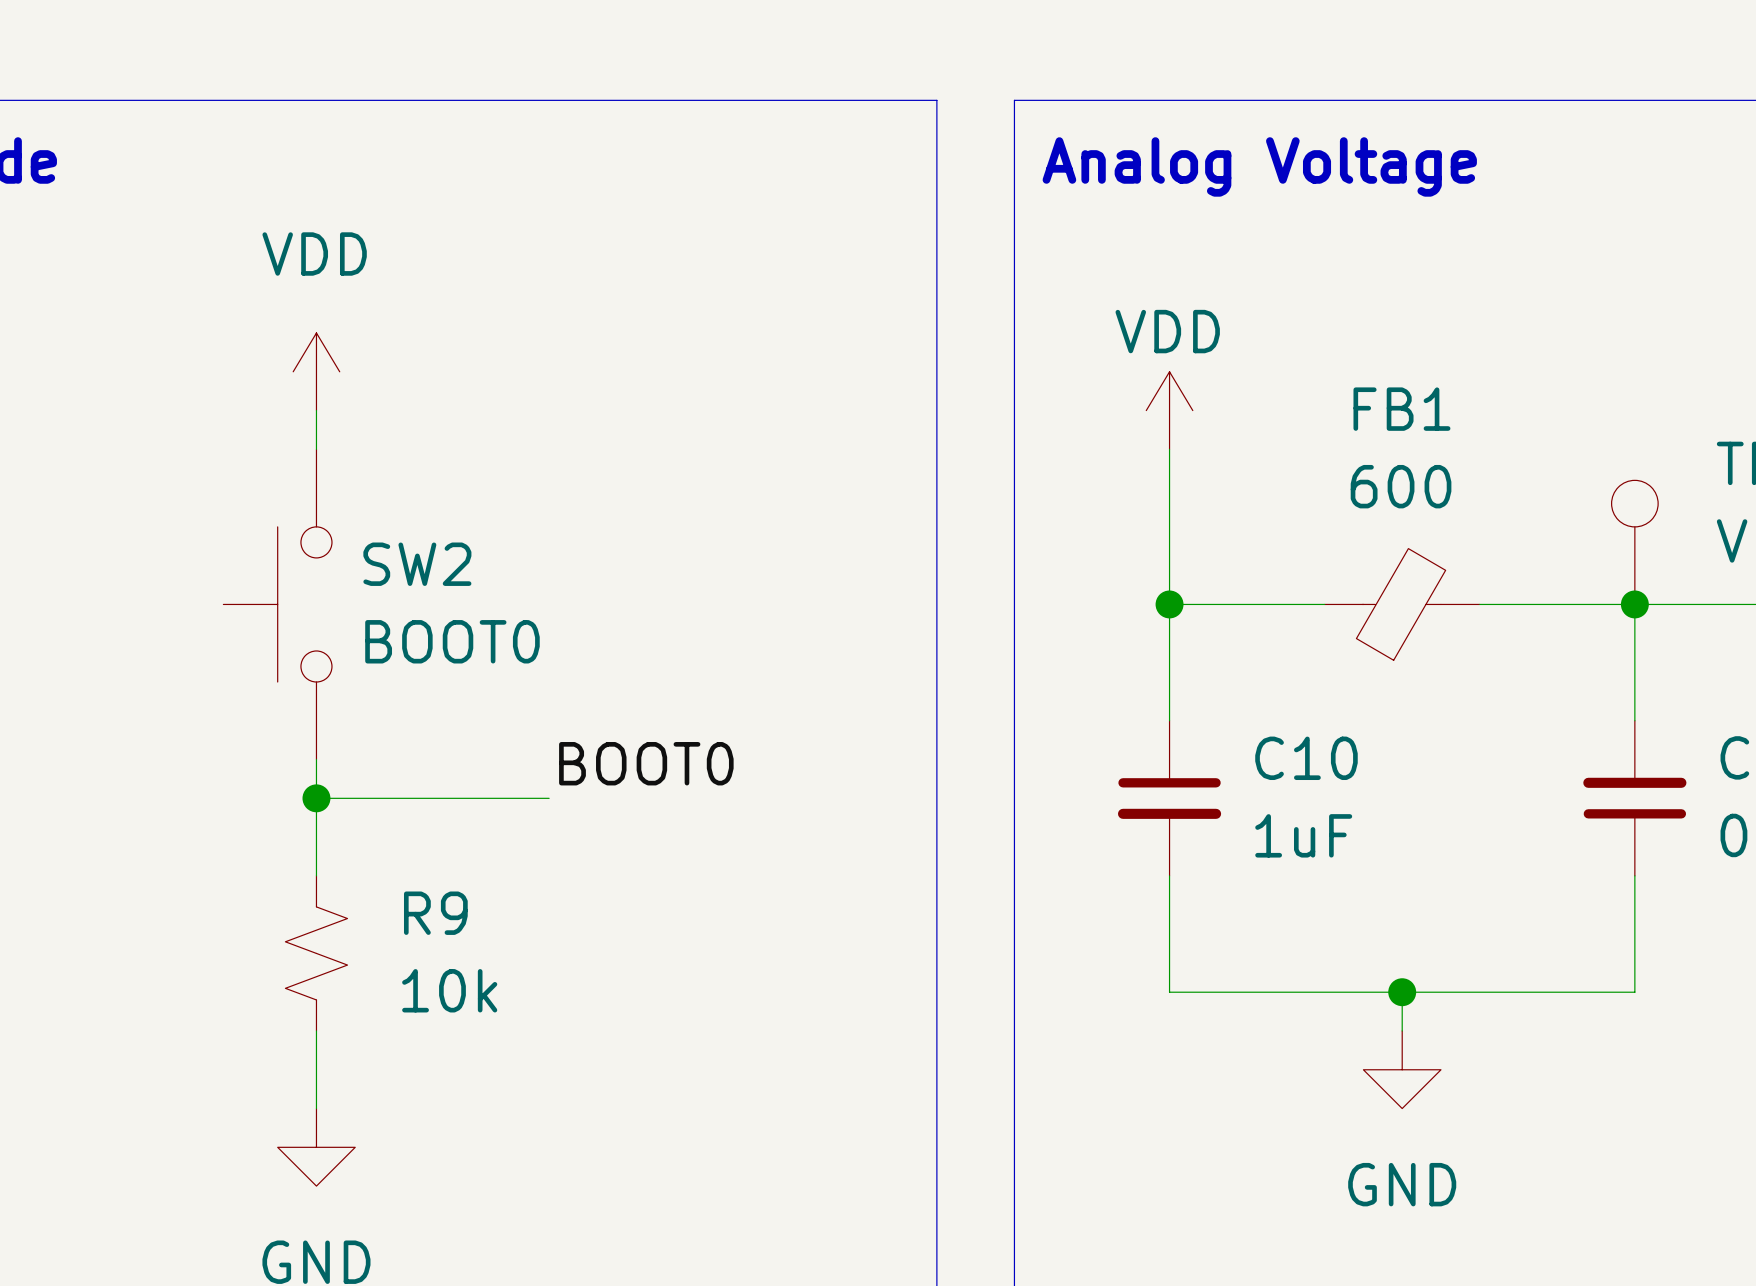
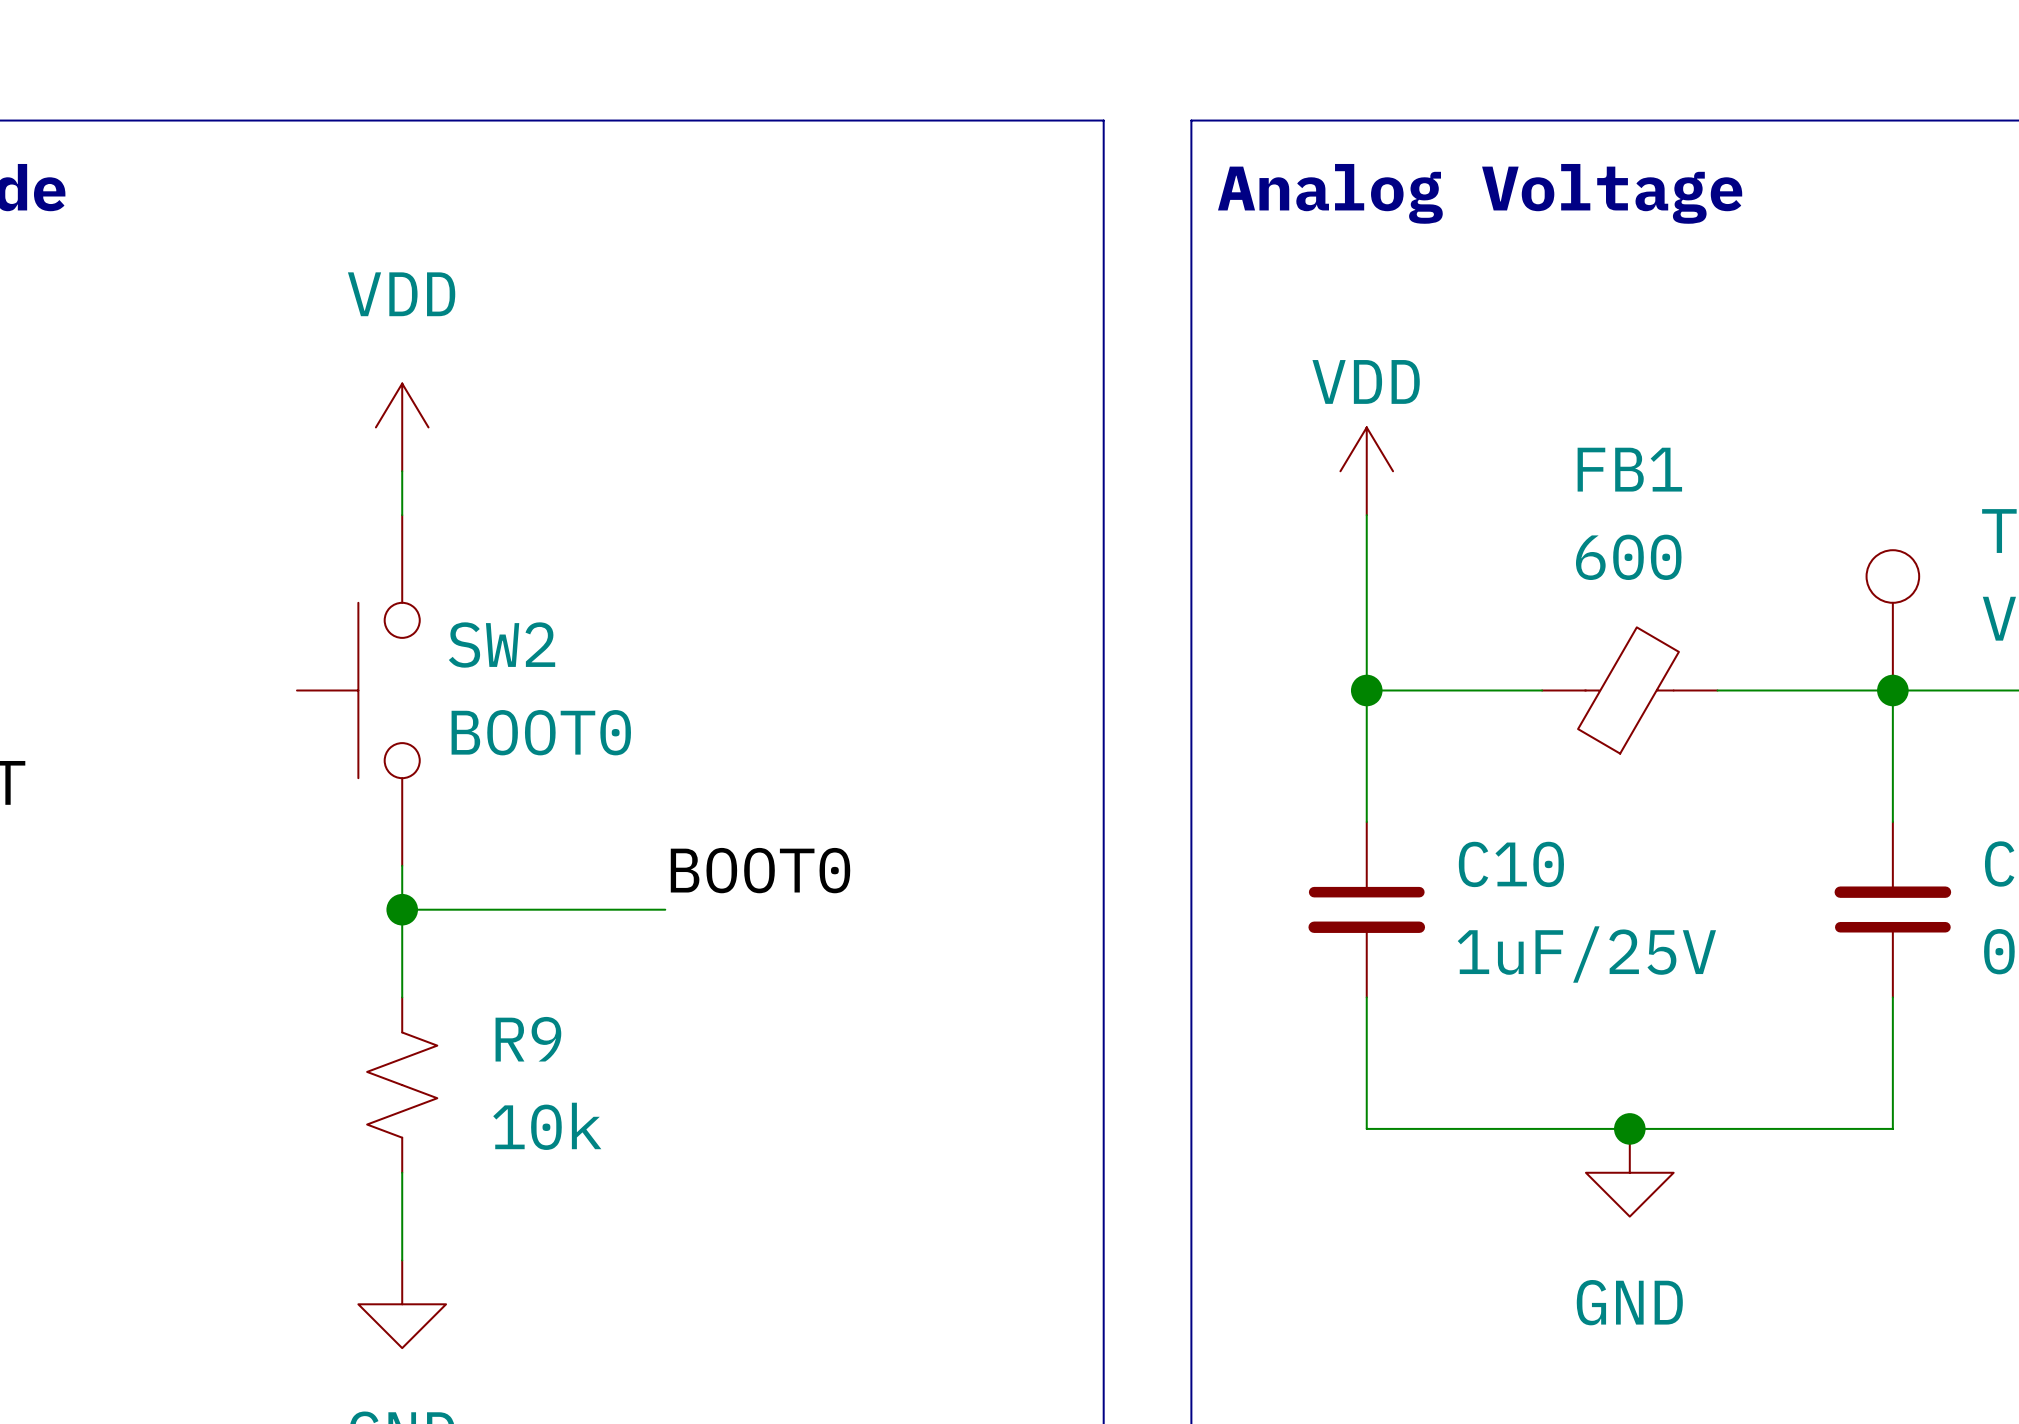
C10 value: 1uF (1303, 835) -> 1uF/25V (1586, 954)
power symbol position: GND (1402, 1069) -> GND (1629, 1172)

